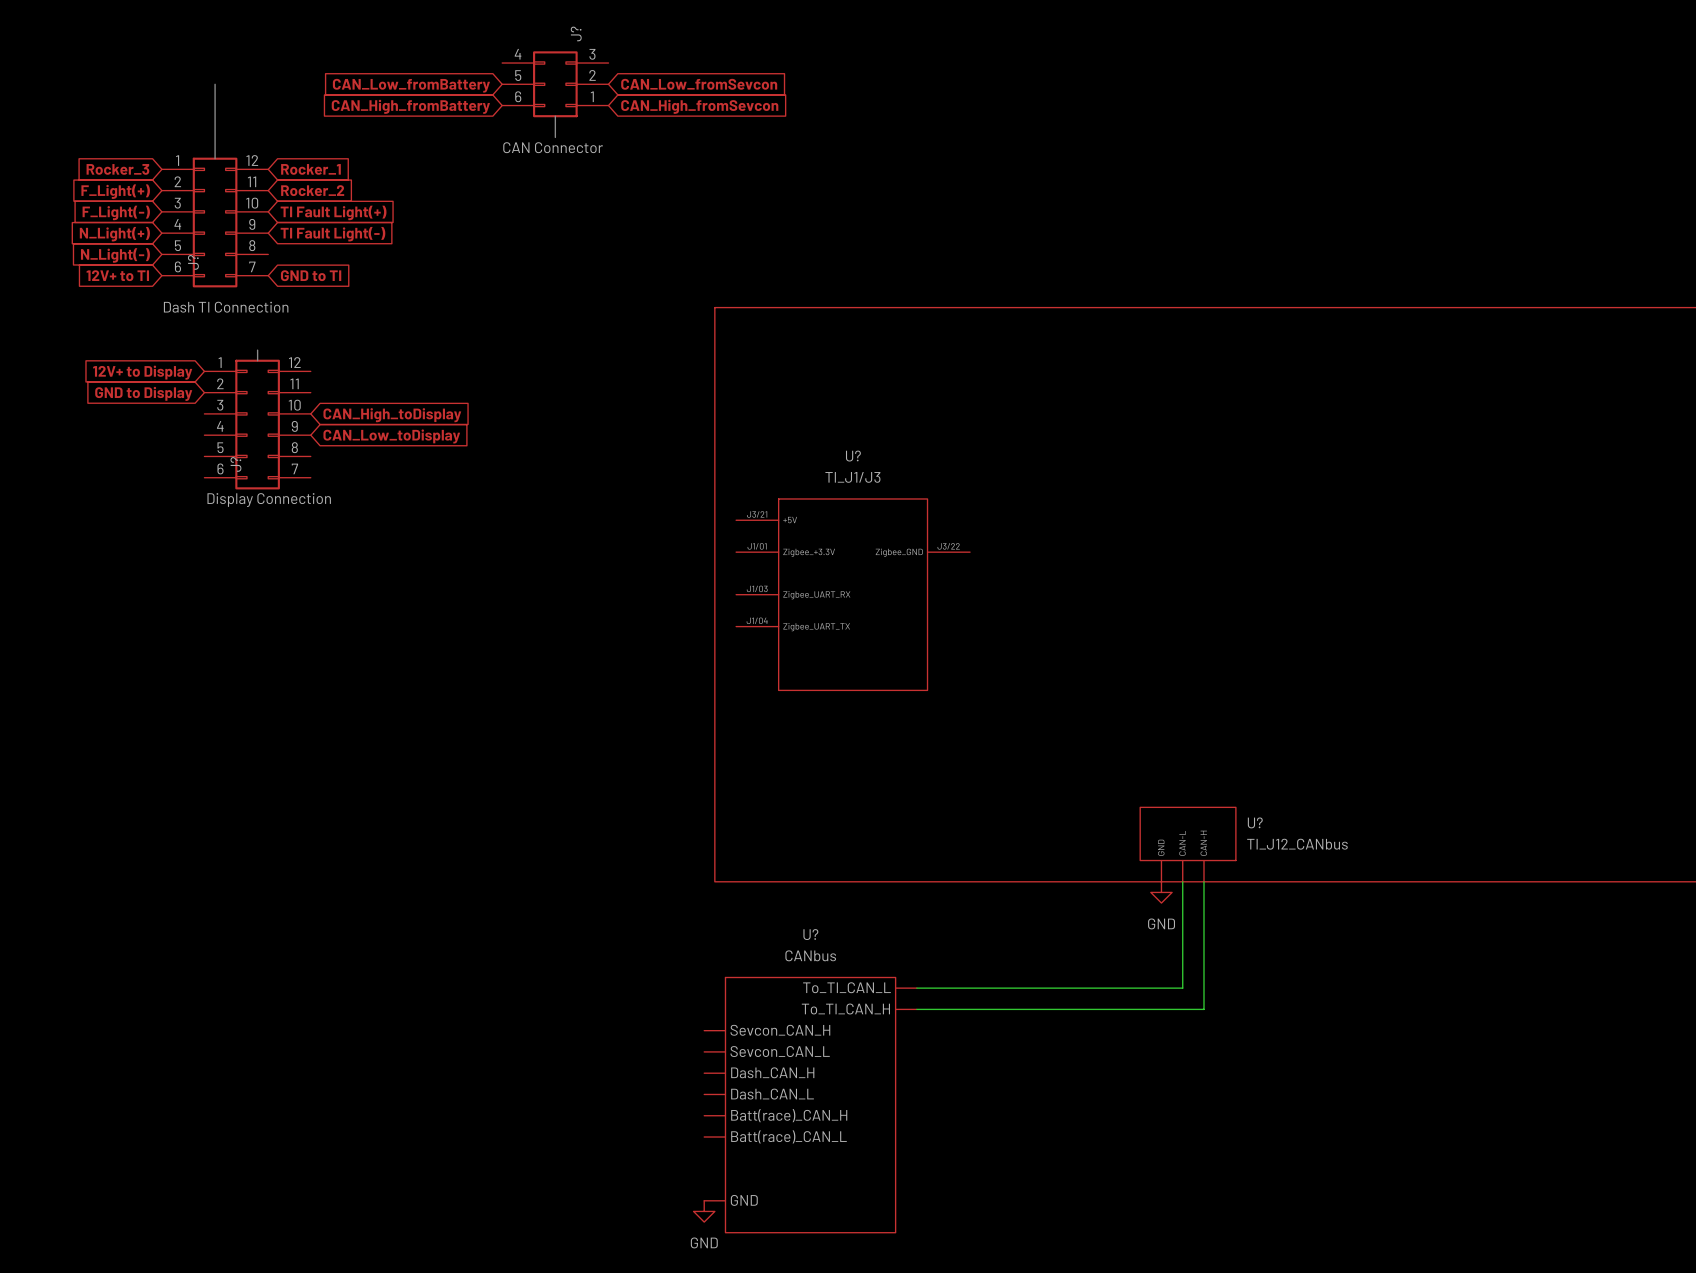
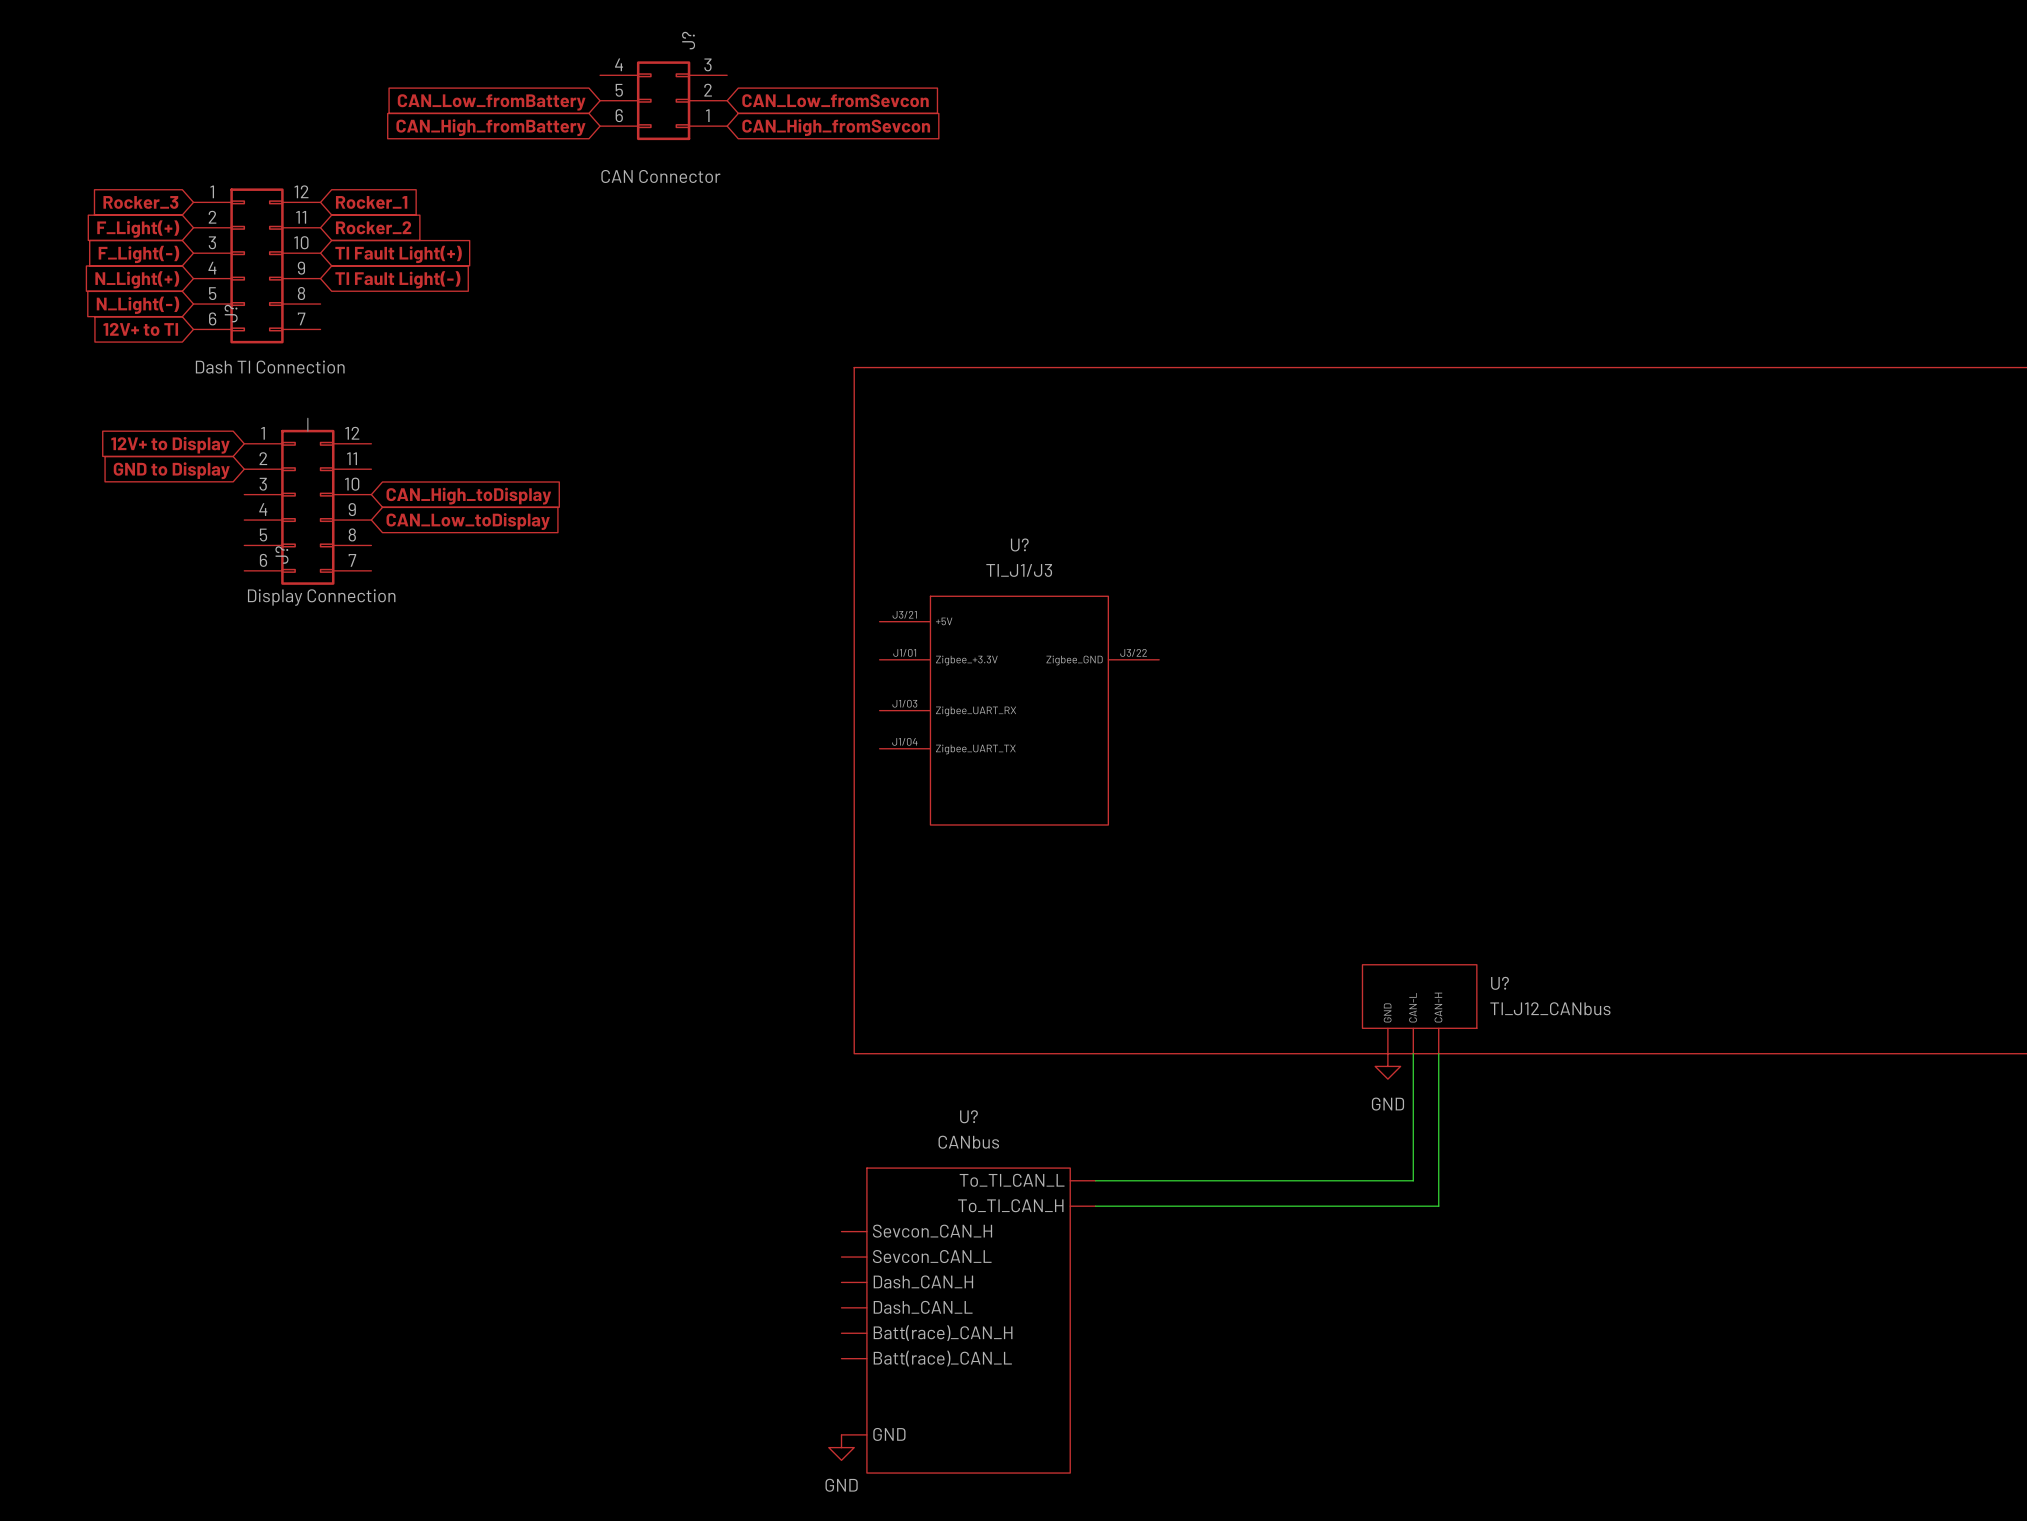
bus: (215, 84) (215, 158) -> none
bus: (555, 116) (555, 137) -> none
global label: GND to TI (311, 275) -> none

